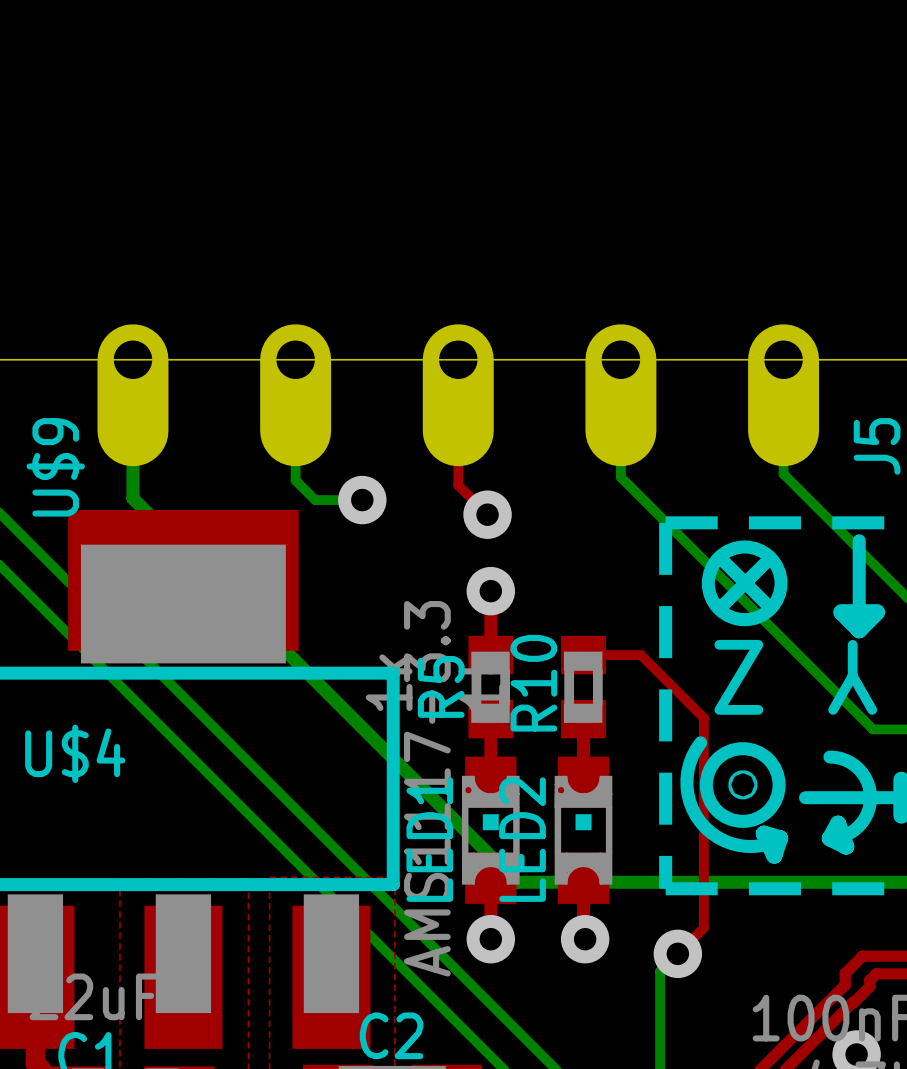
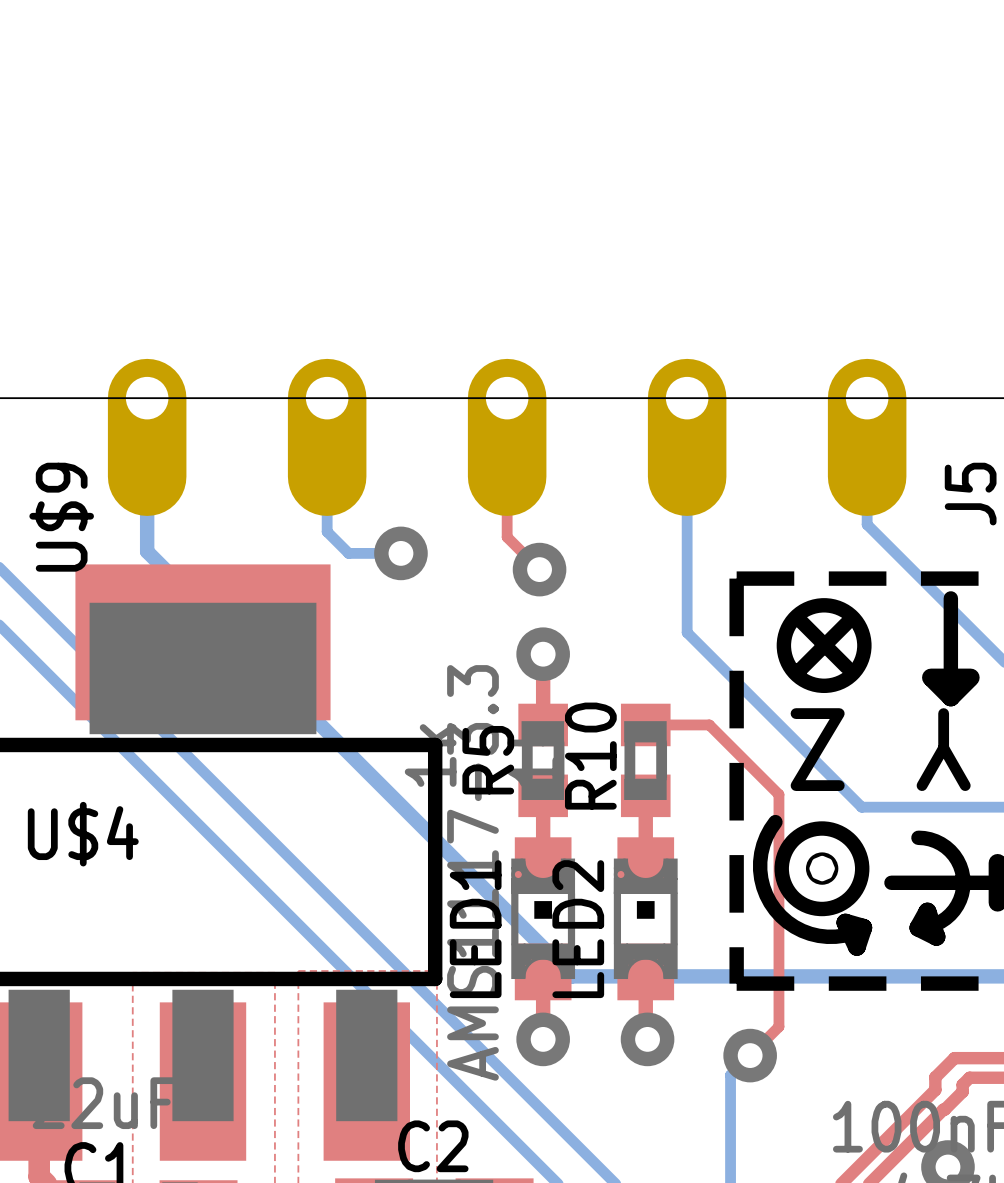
bottom track: (620, 477) (873, 729) -> (687, 528) (687, 632) (861, 807) (966, 807)

